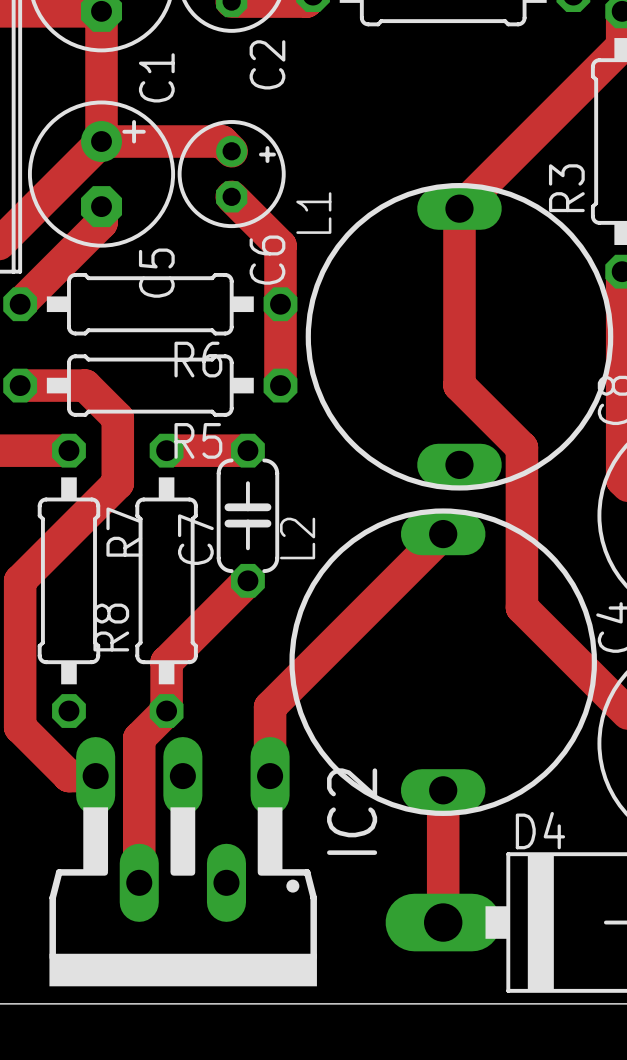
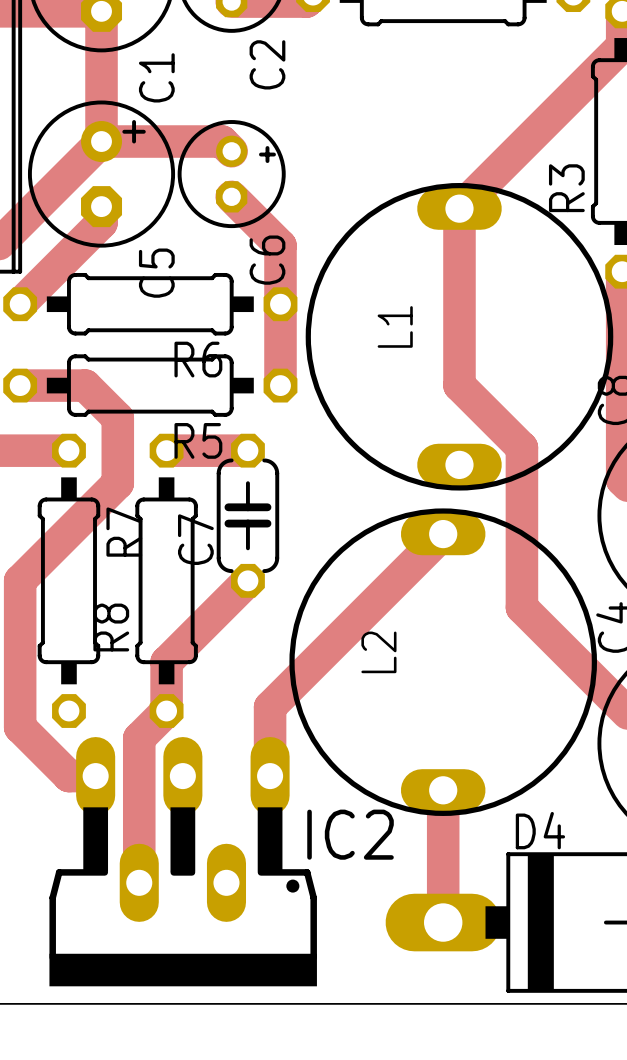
L1 name position: L1 (313, 213) -> L1 (395, 326)
L2 name position: L2 (297, 538) -> L2 (378, 652)
IC2 name rotation: 0° (352, 811) -> 90° clockwise (350, 834)

